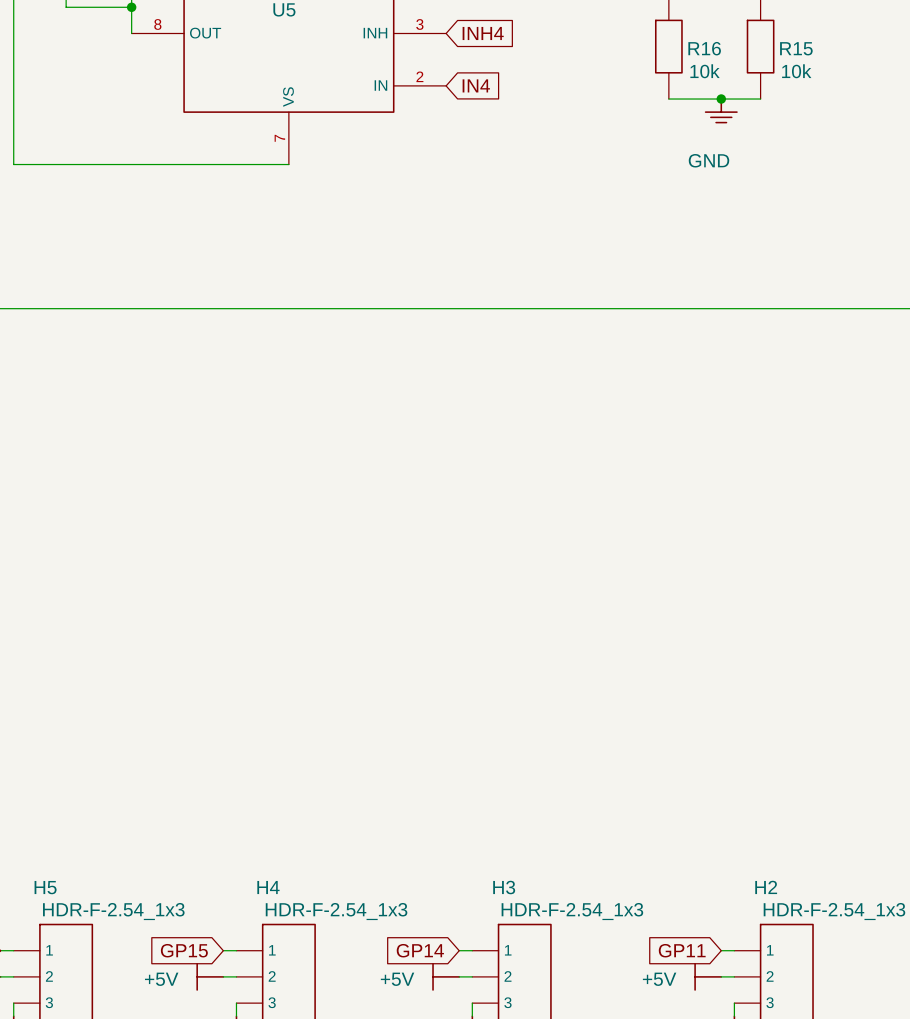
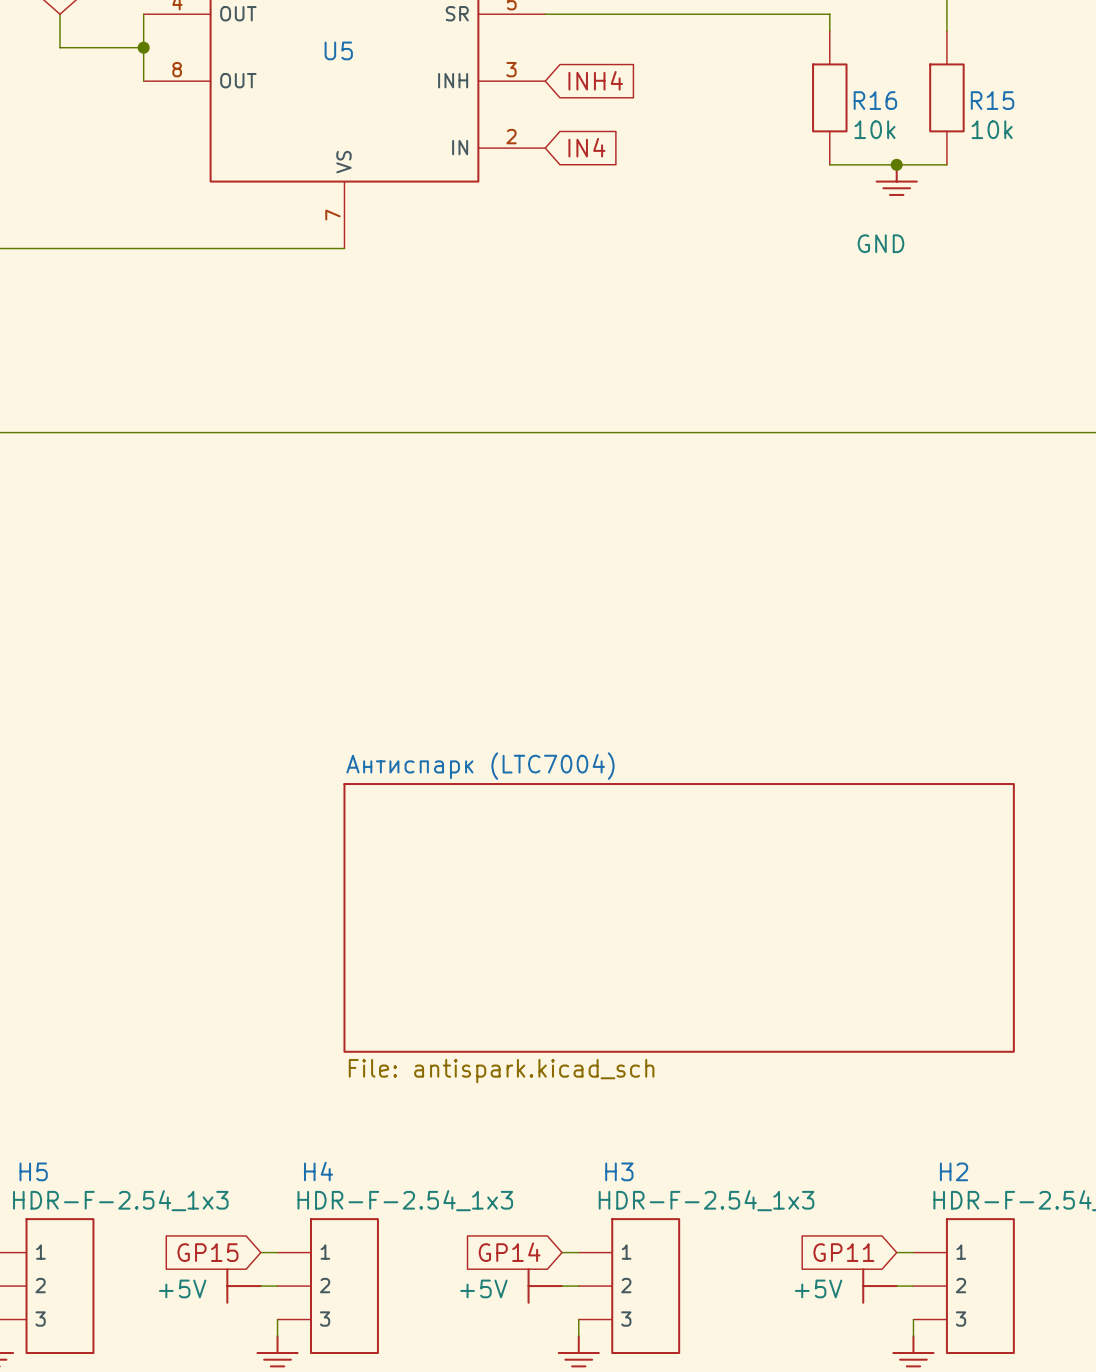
sheet Антиспарк (LTC7004): none -> File: antispark.kicad_sch (679, 917)

